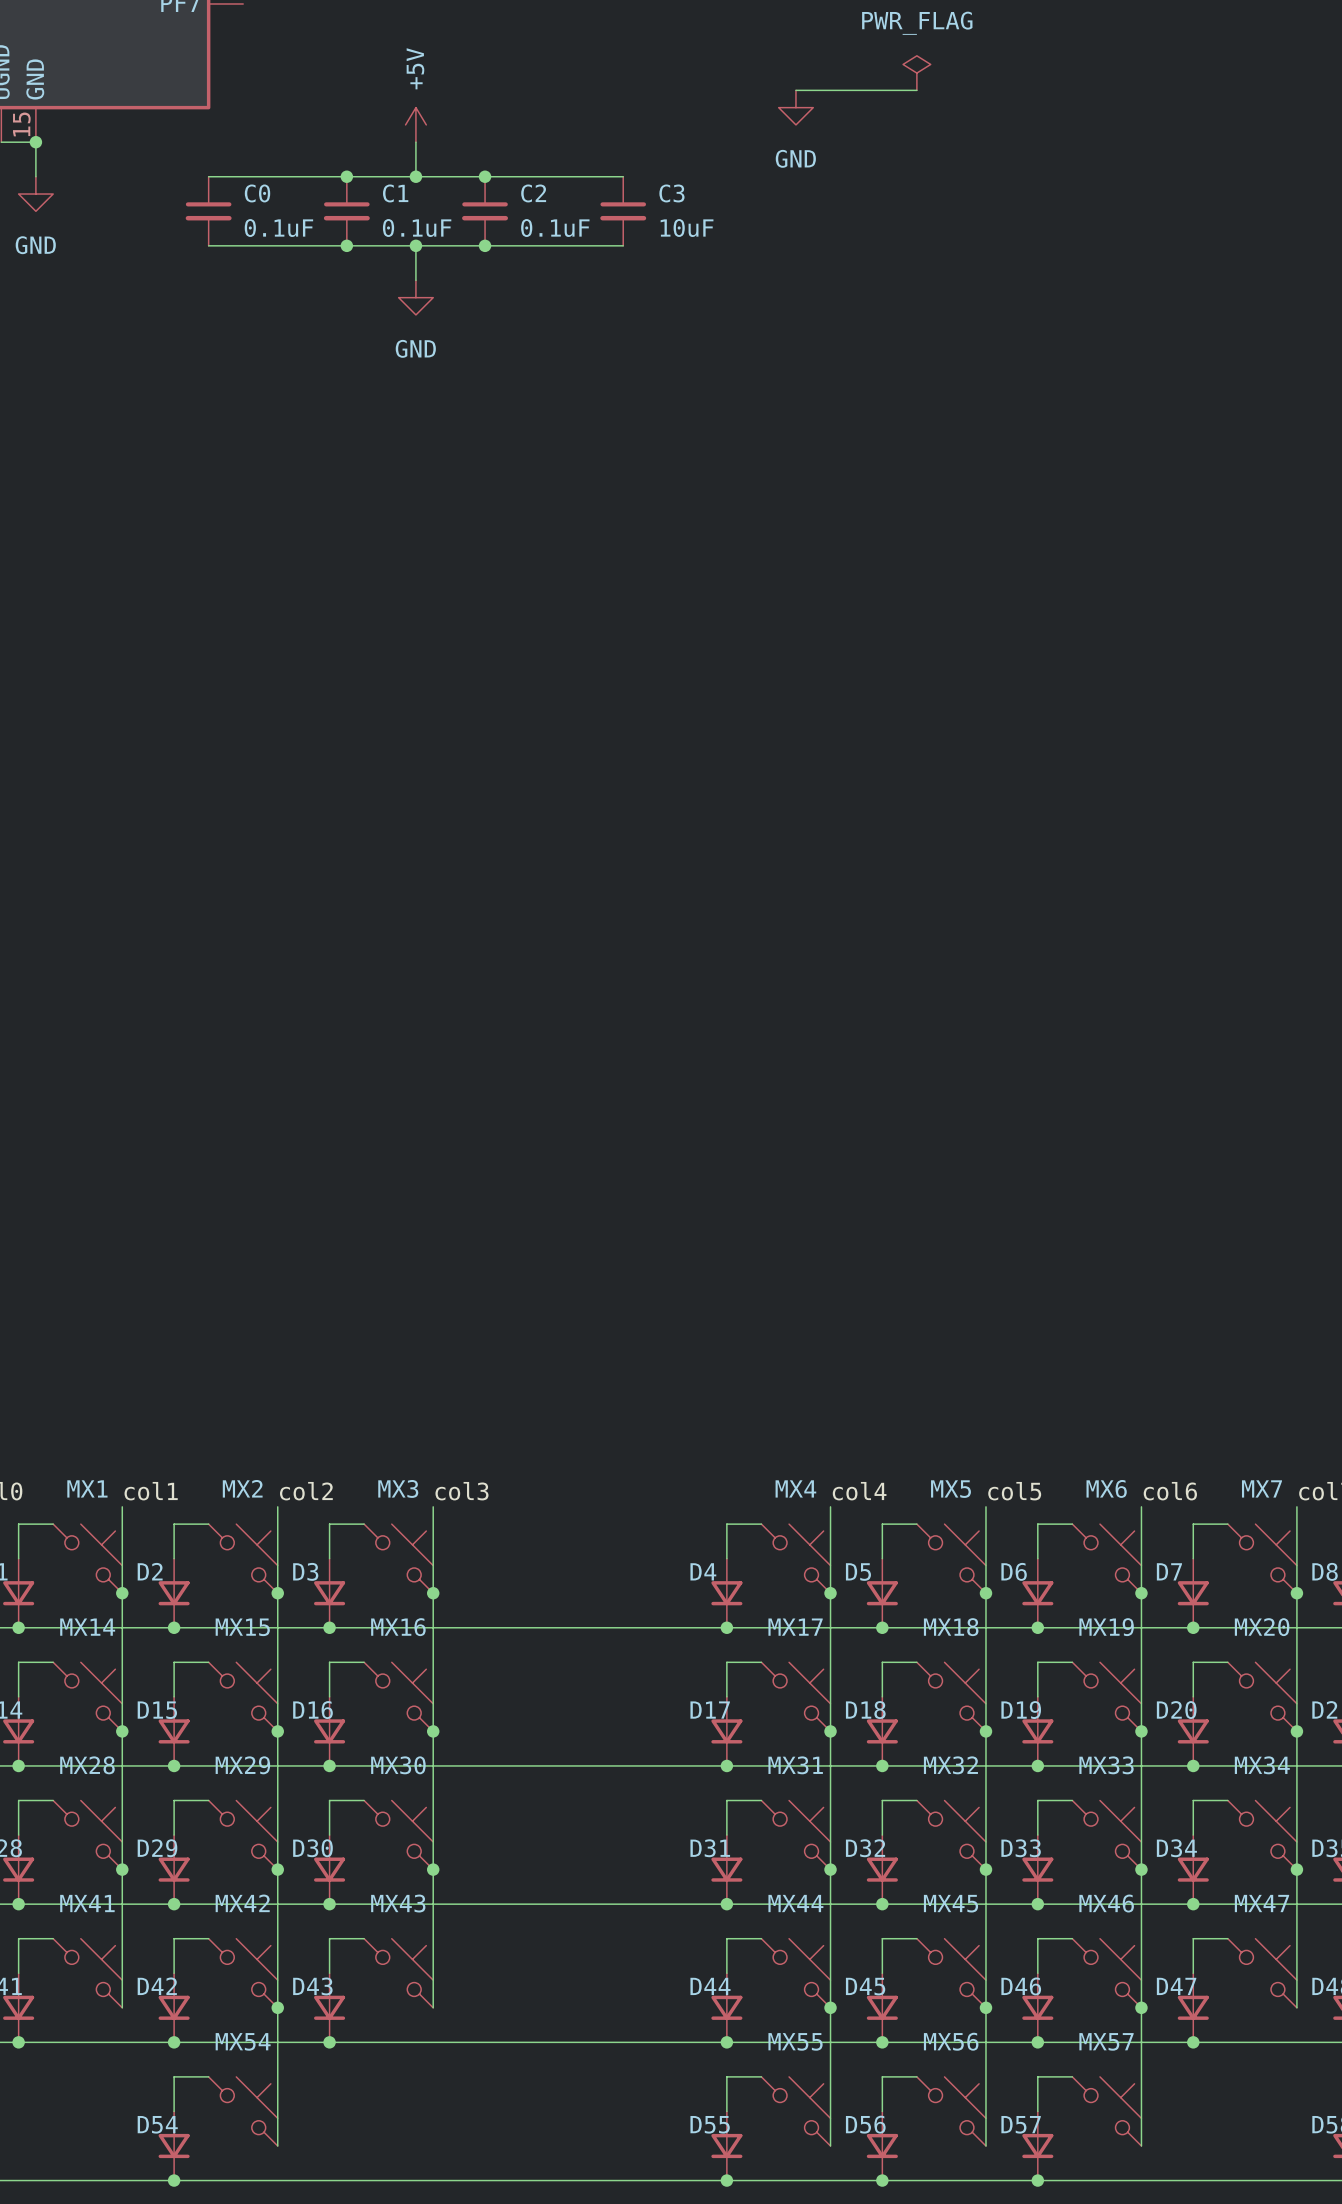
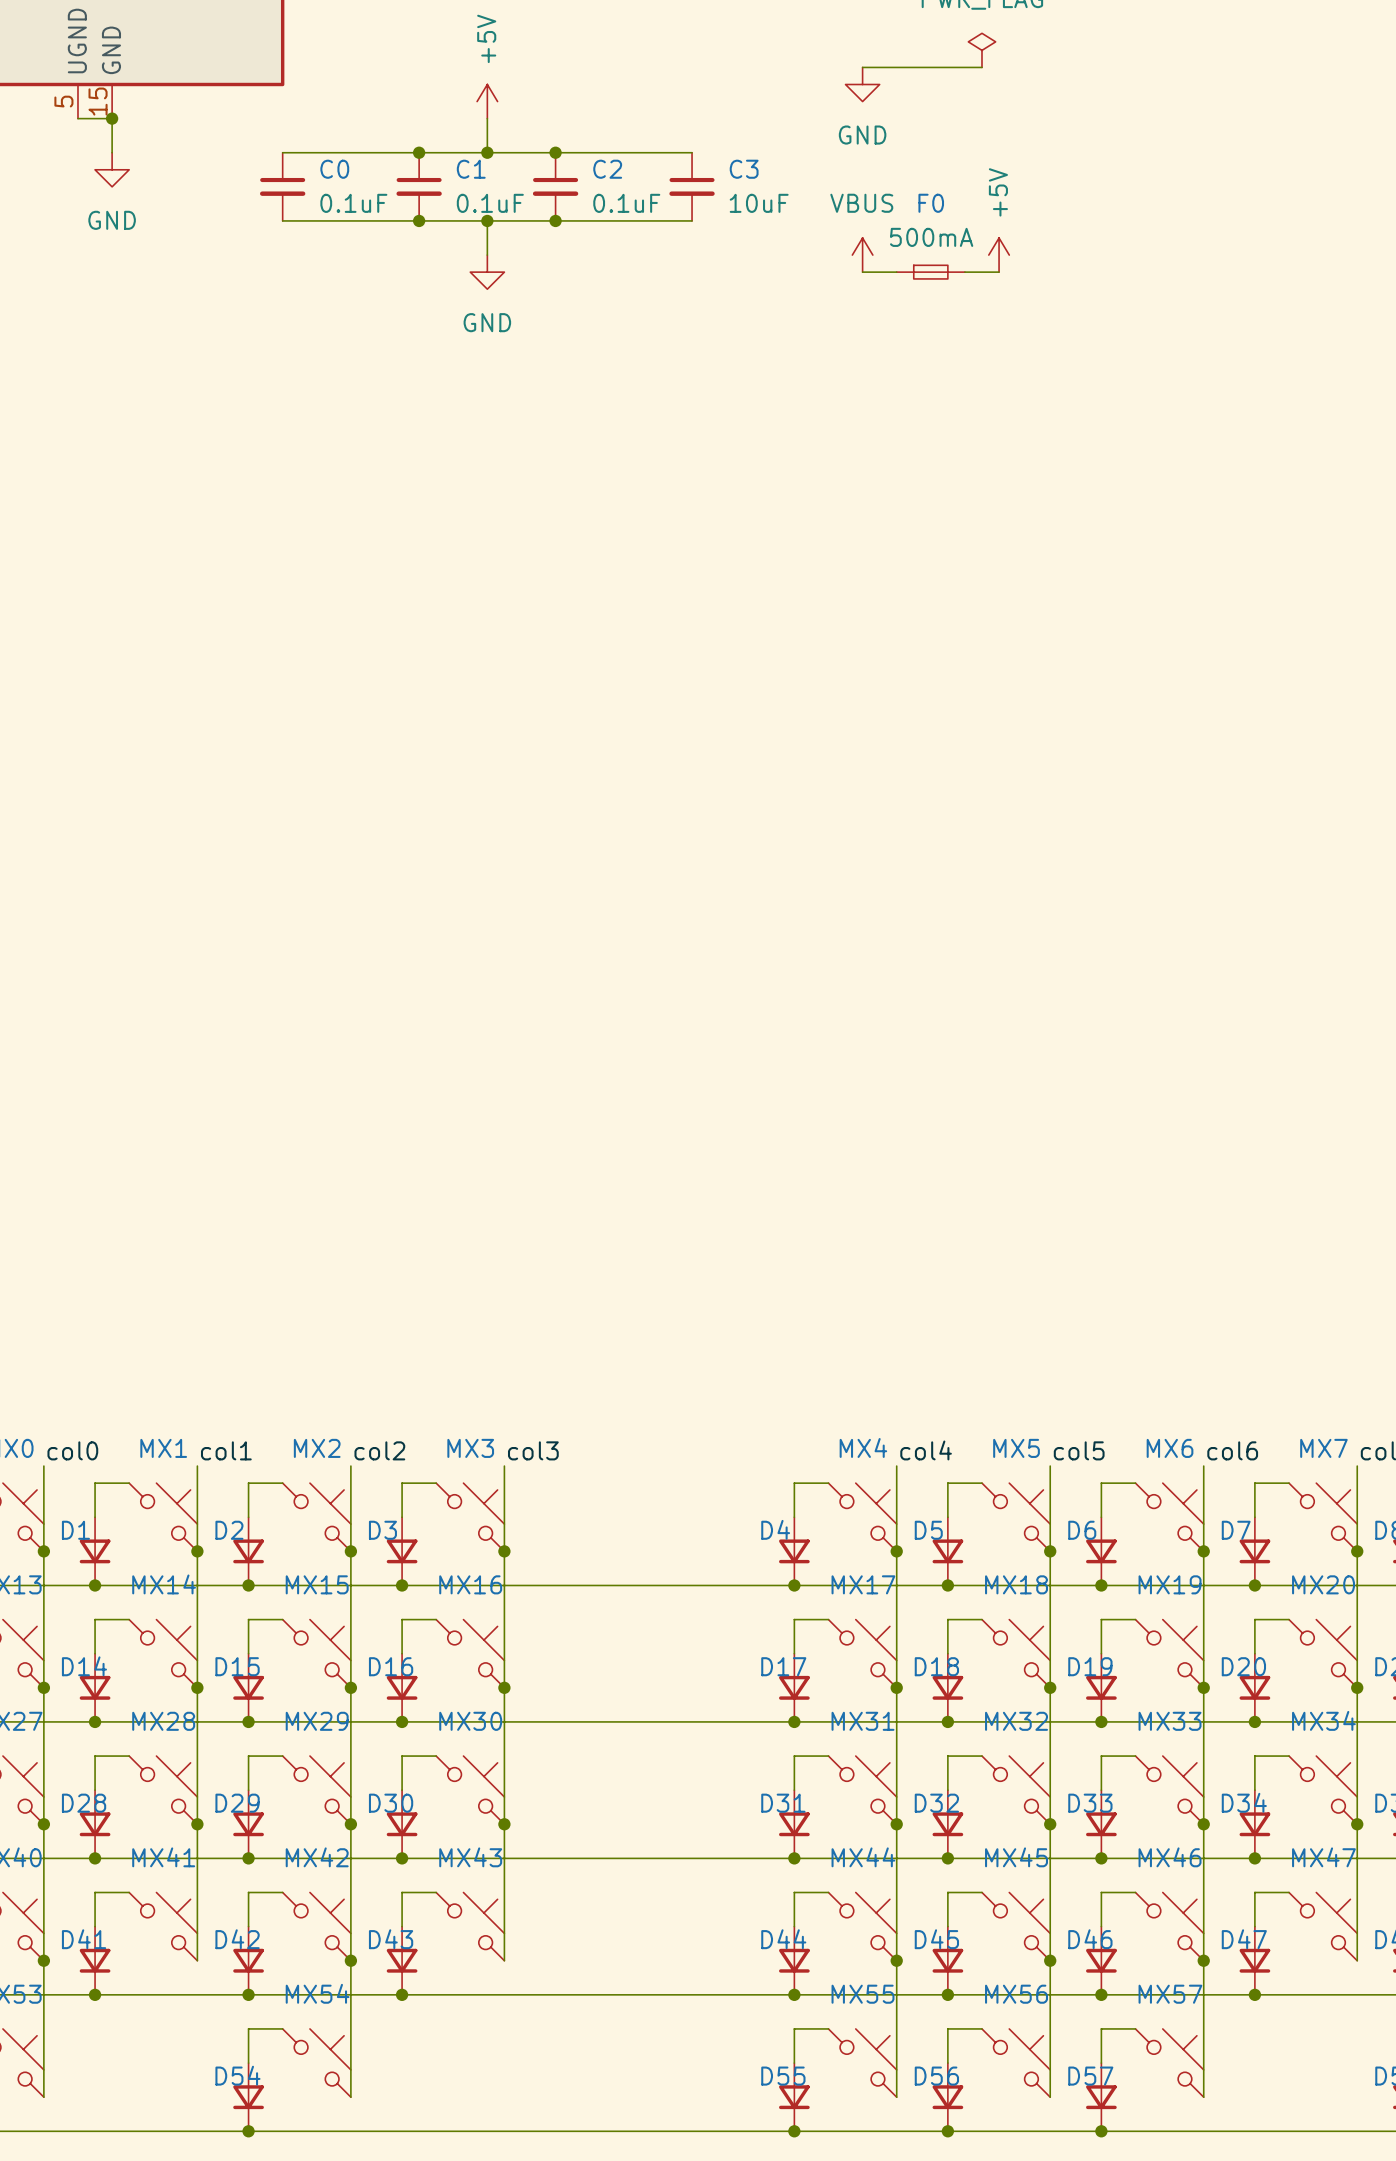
power symbol: none -> VBUS (862, 255)
power symbol: none -> +5V (999, 255)
wire: none -> (862, 272) (896, 272)
F0: none -> 500mA (930, 272)
wire: none -> (964, 272) (999, 272)

